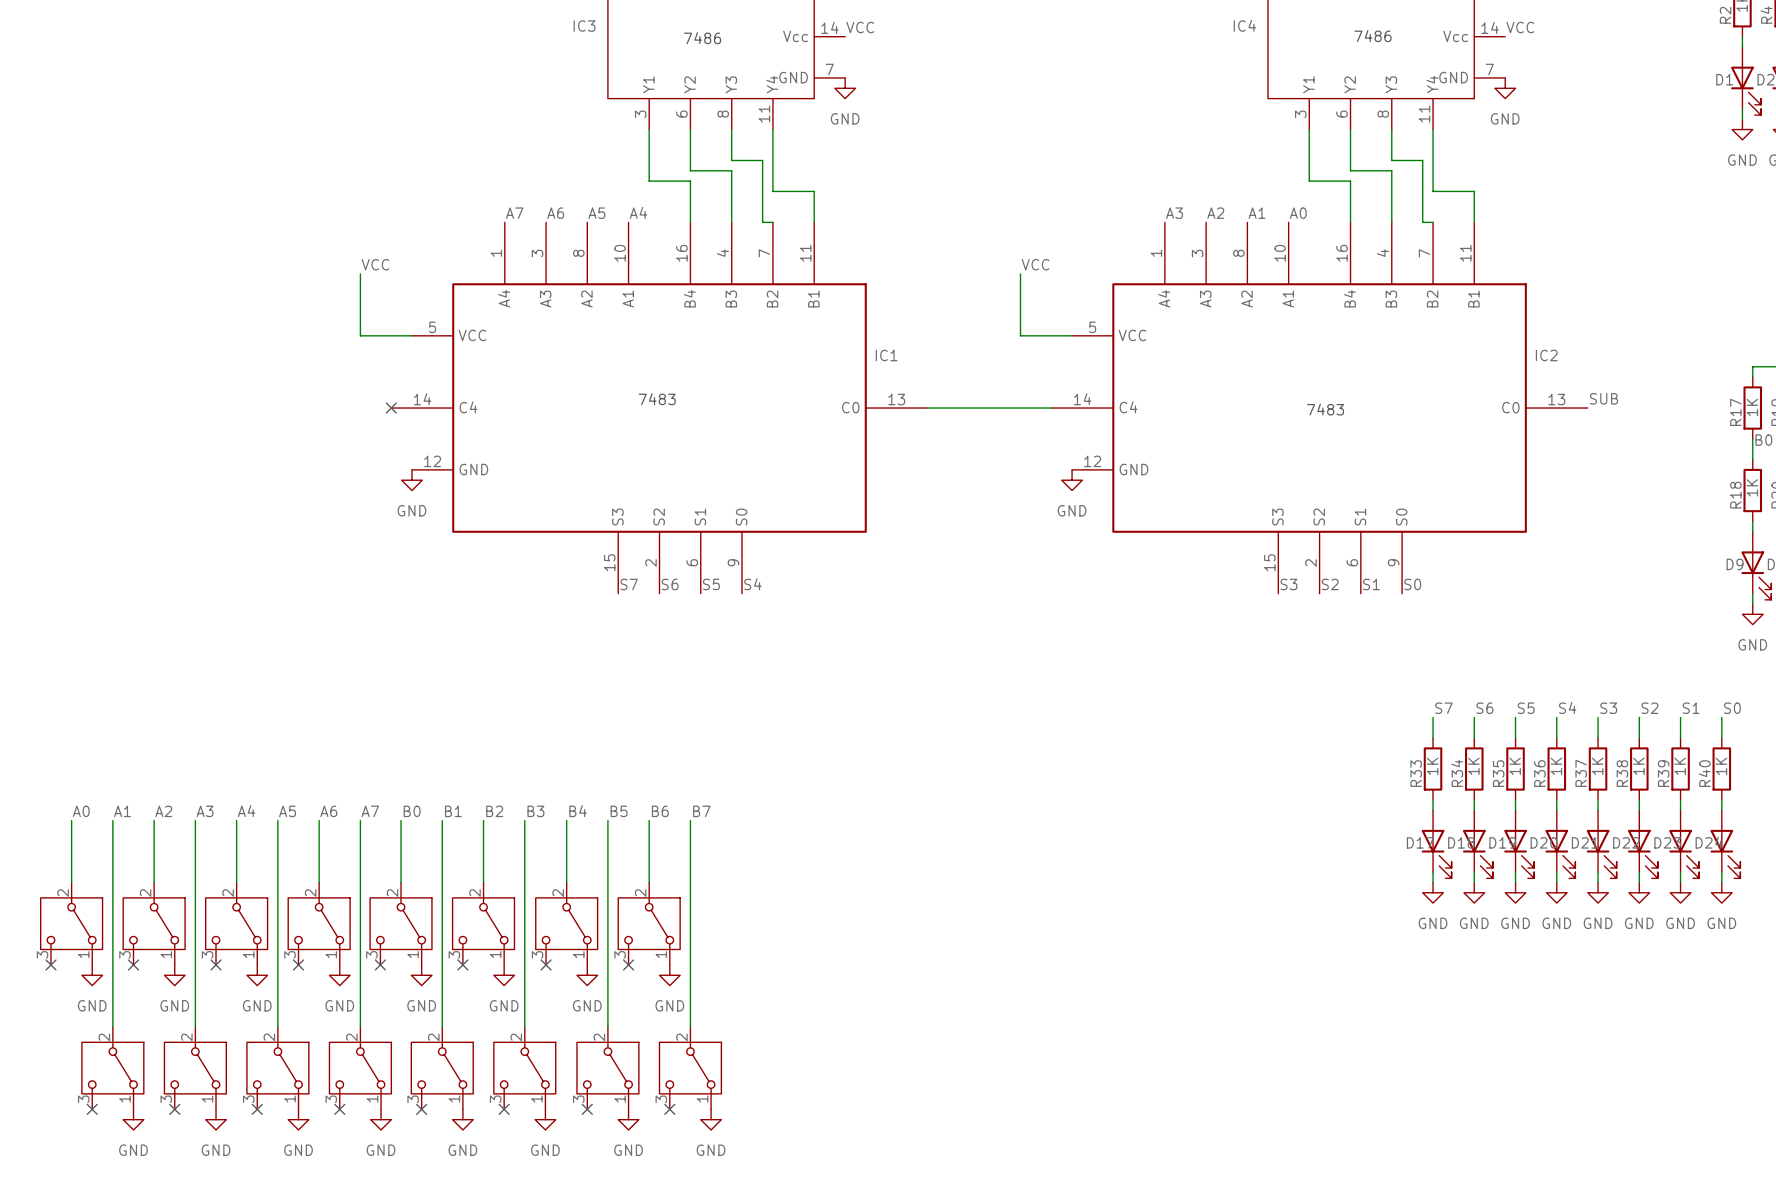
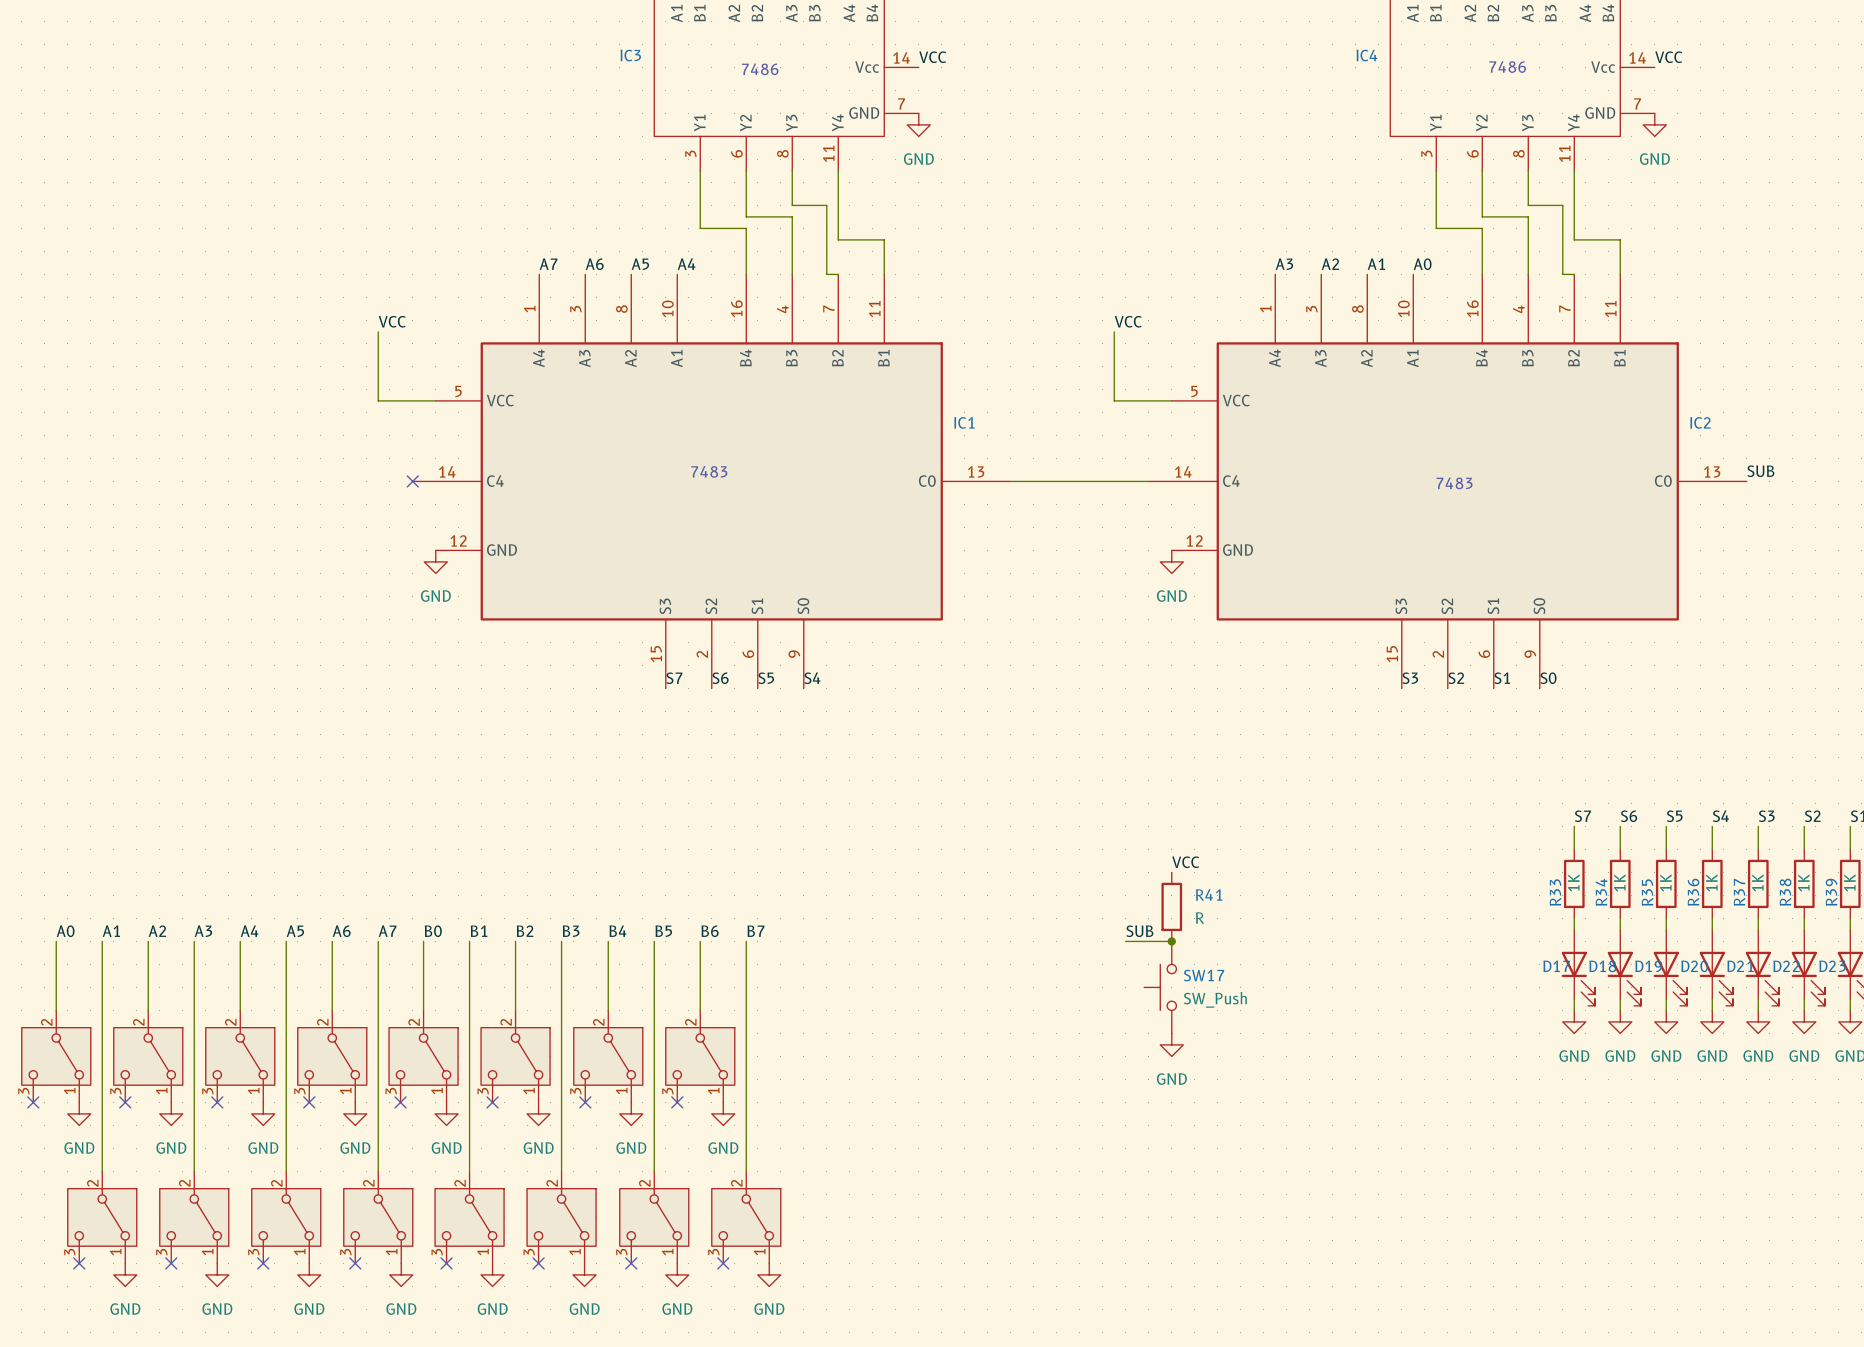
label: none -> VCC (1185, 862)
R41: none -> R (1171, 906)
label: none -> SUB (1139, 931)
wire: none -> (1125, 941) (1171, 941)
junction: none -> (1171, 941)
SW17: none -> SW_Push (1160, 987)
power symbol: none -> GND (1171, 1044)

